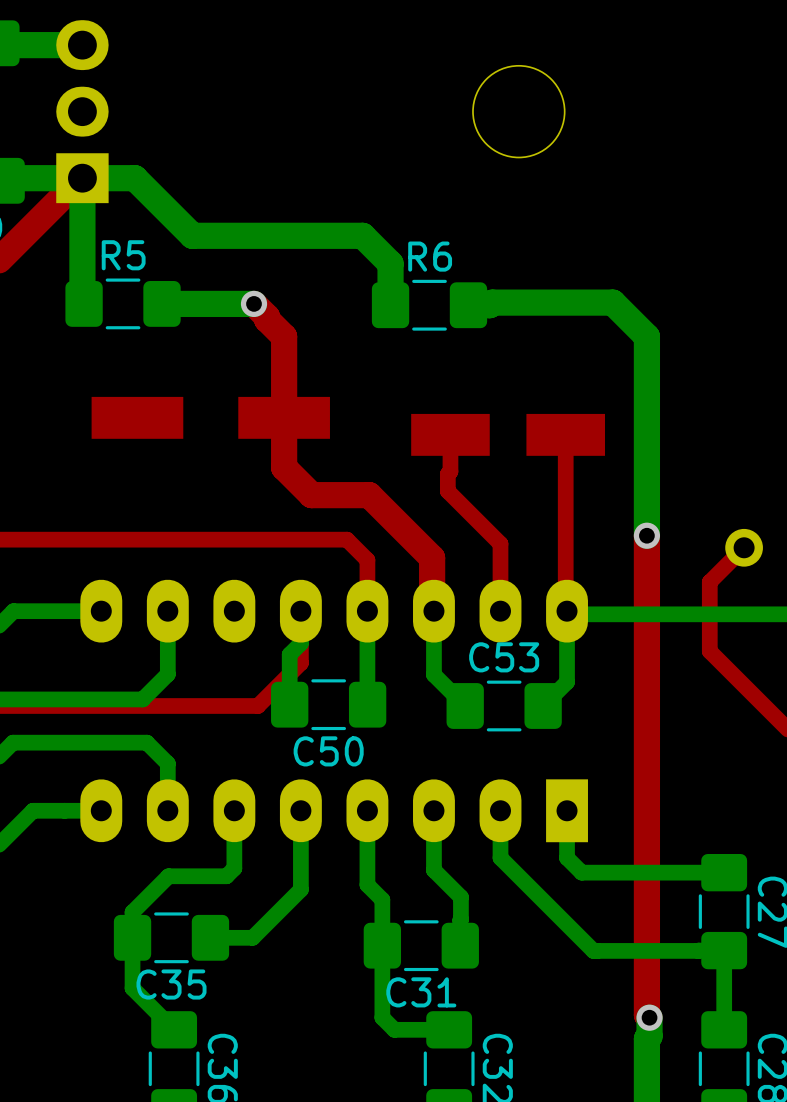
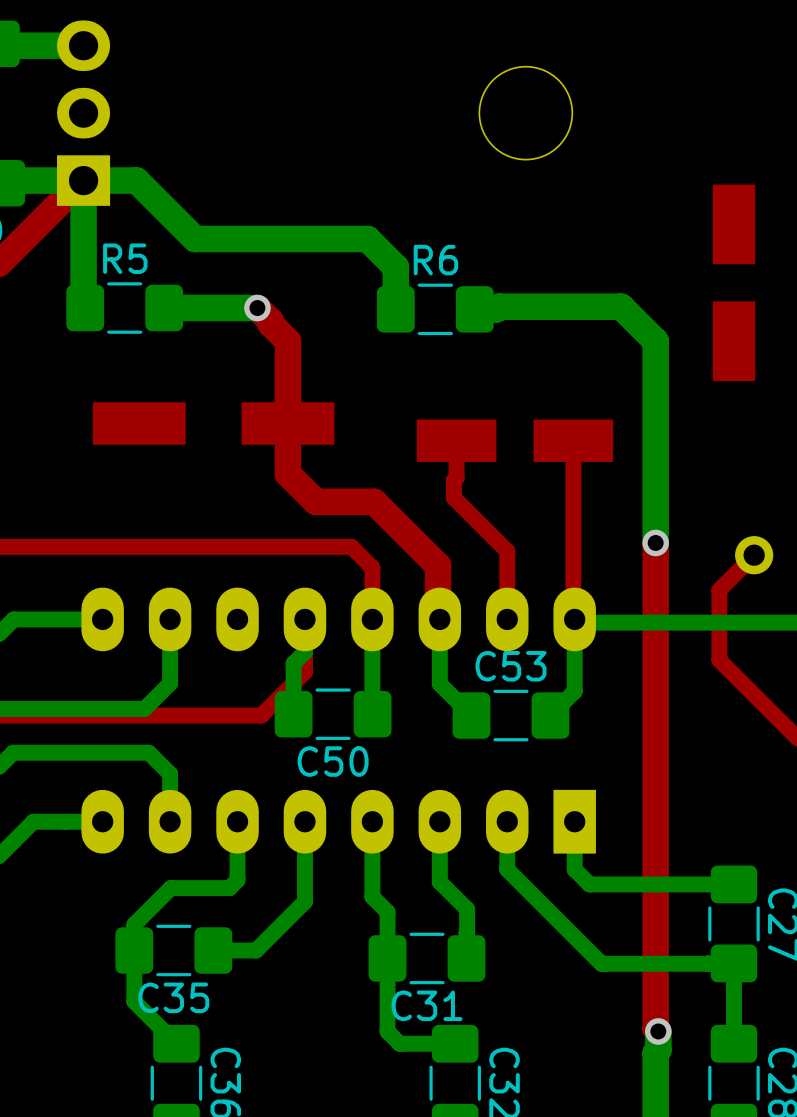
part: none -> (733, 282)

